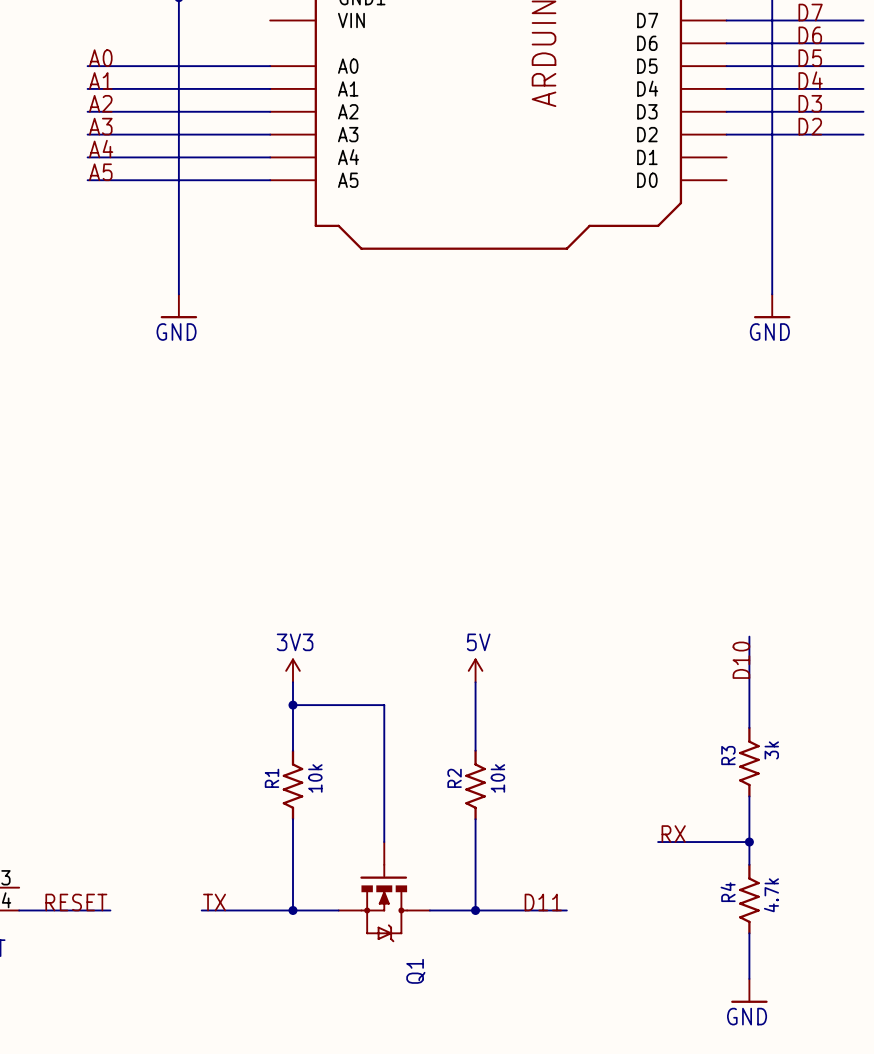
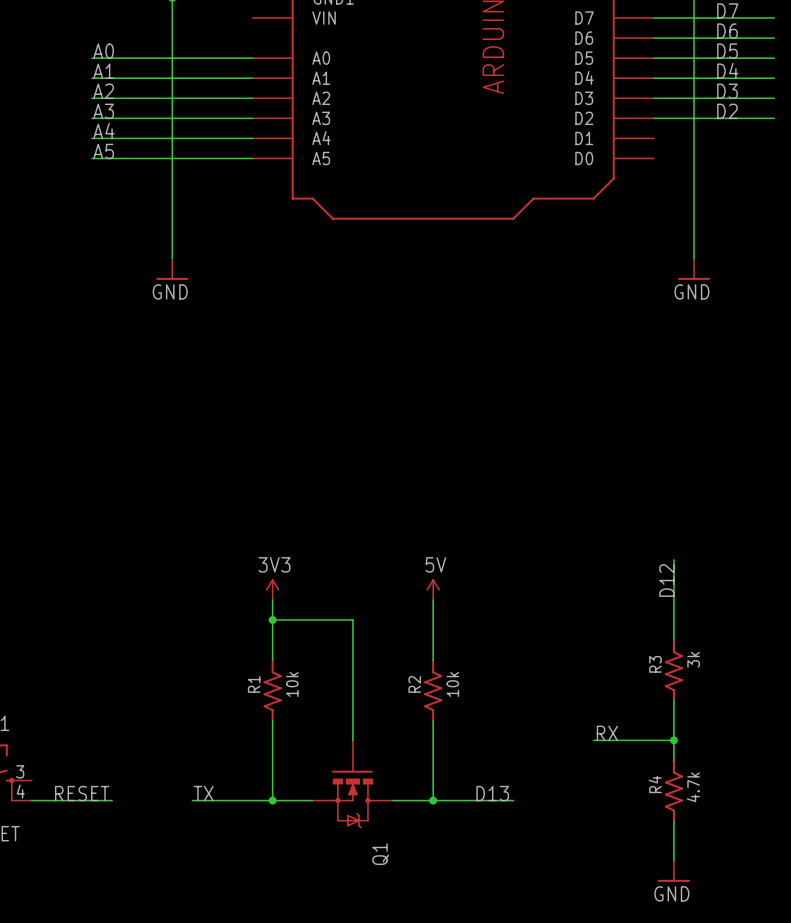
label: D10 (741, 660) -> D12 (666, 580)
label: D11 (543, 902) -> D13 (492, 793)

